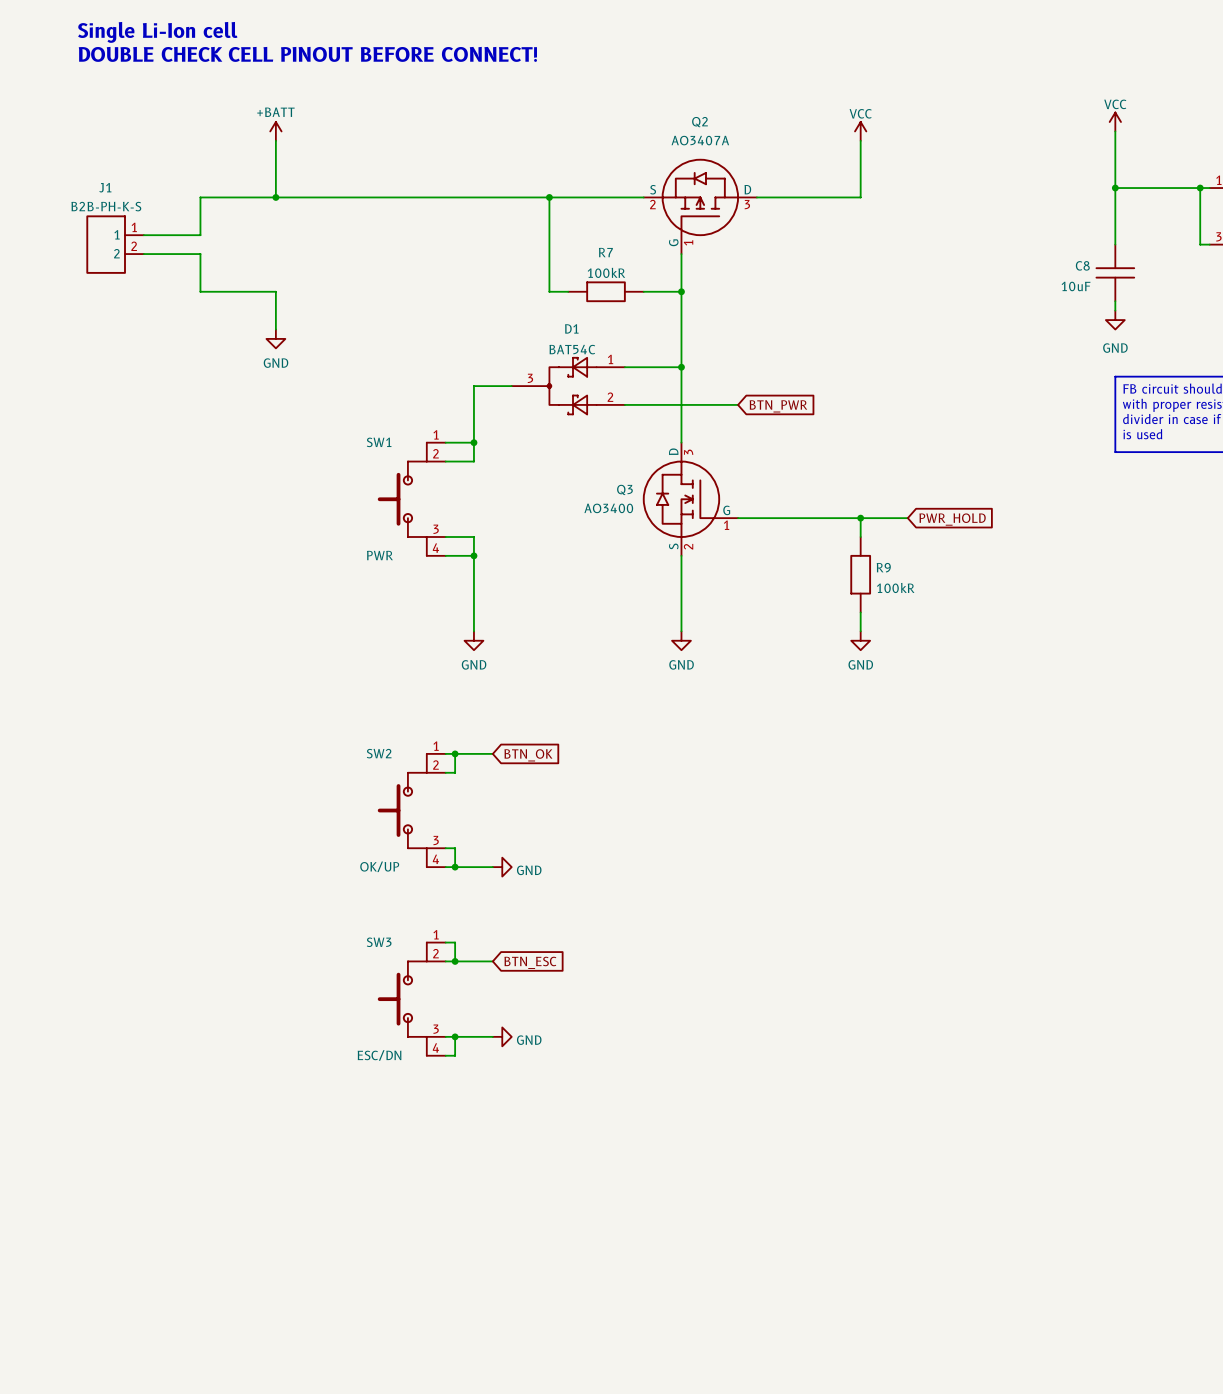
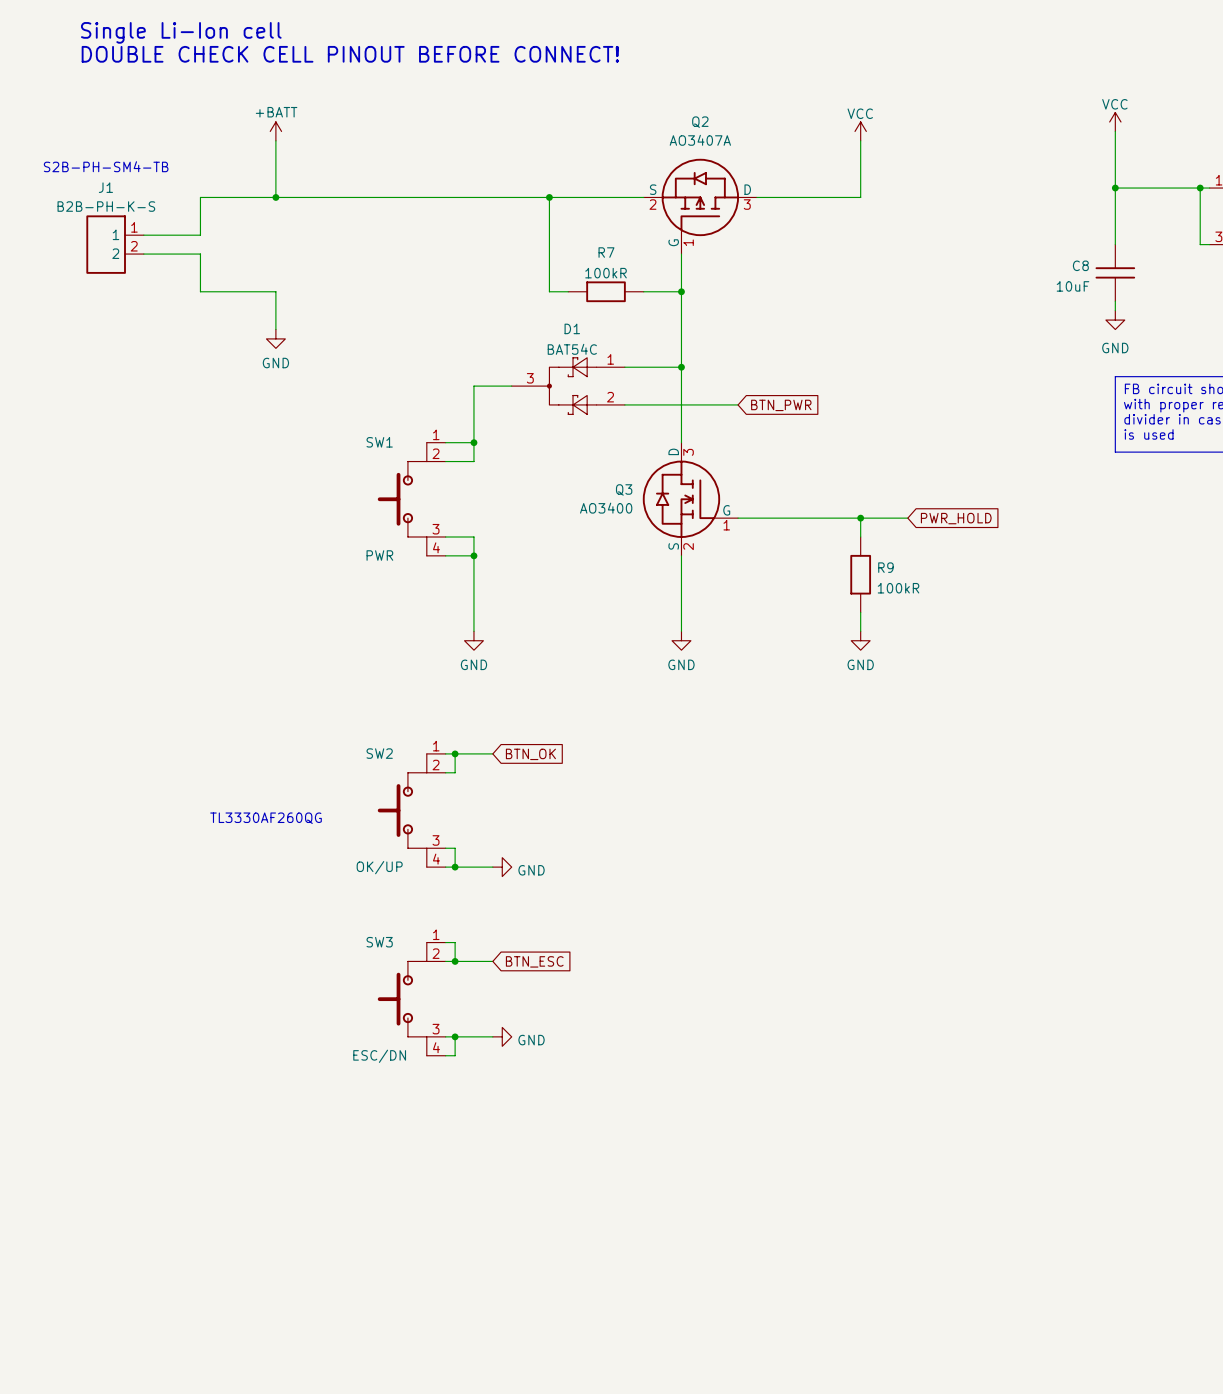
text: none -> S2B-PH-SM4-TB (106, 166)
text: none -> TL3330AF260QG (266, 818)

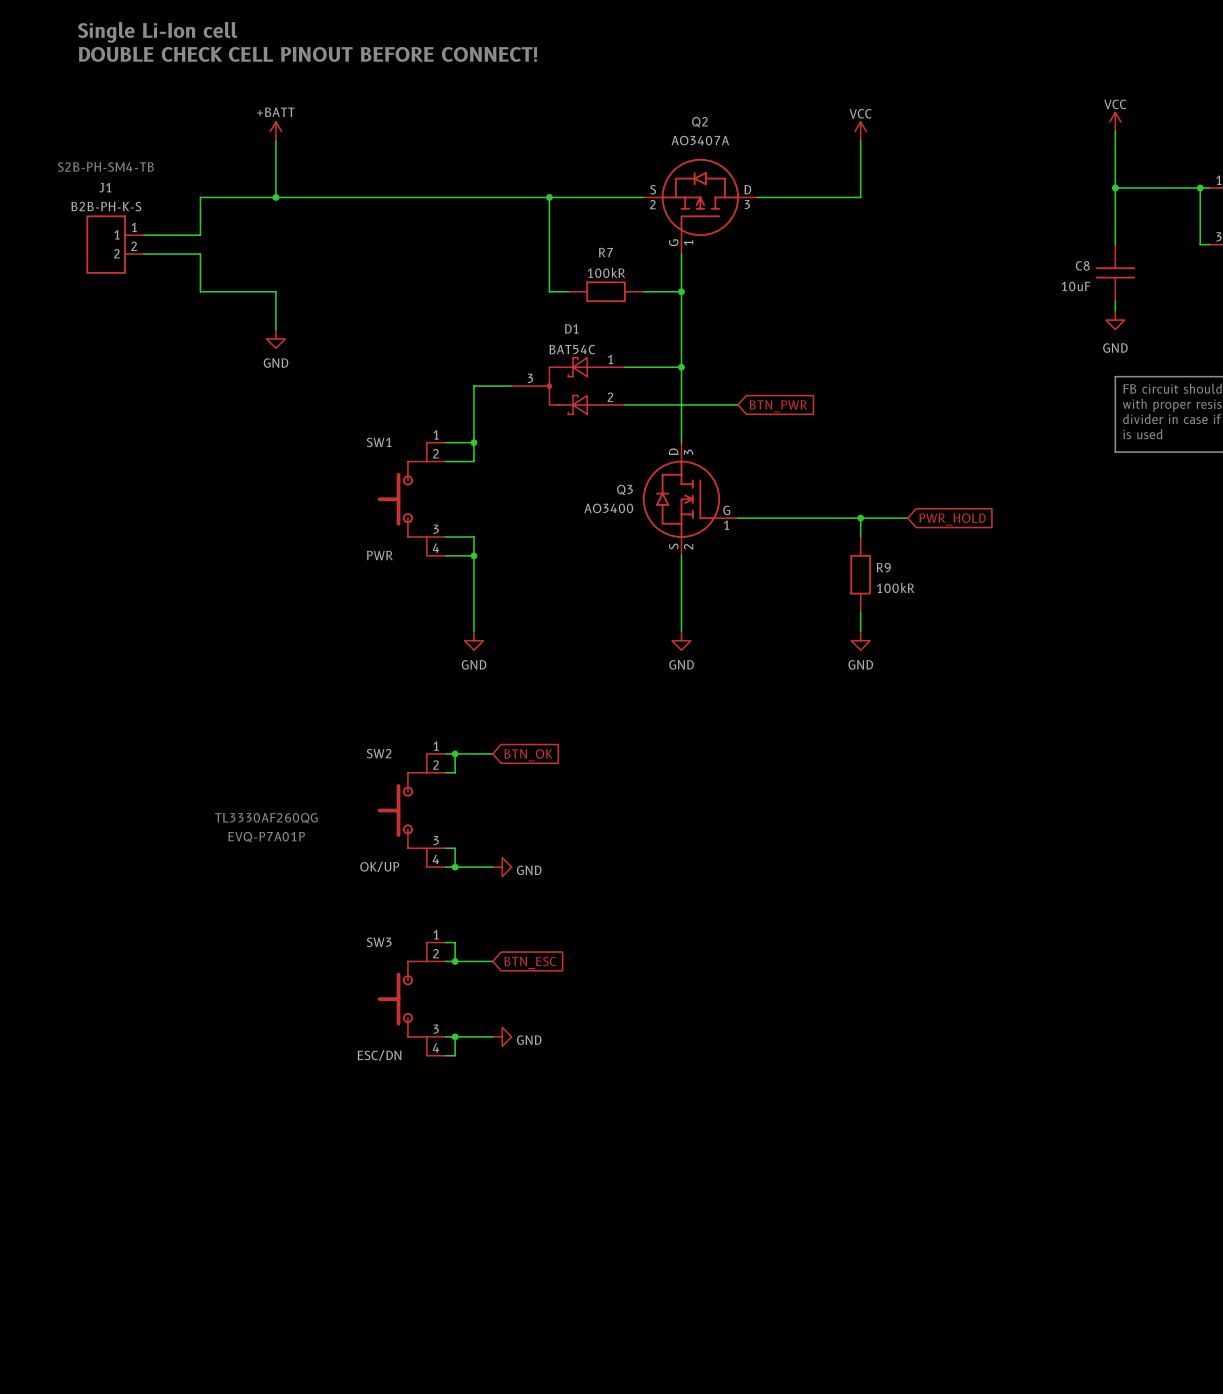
text: none -> EVQ-P7A01P (266, 837)

